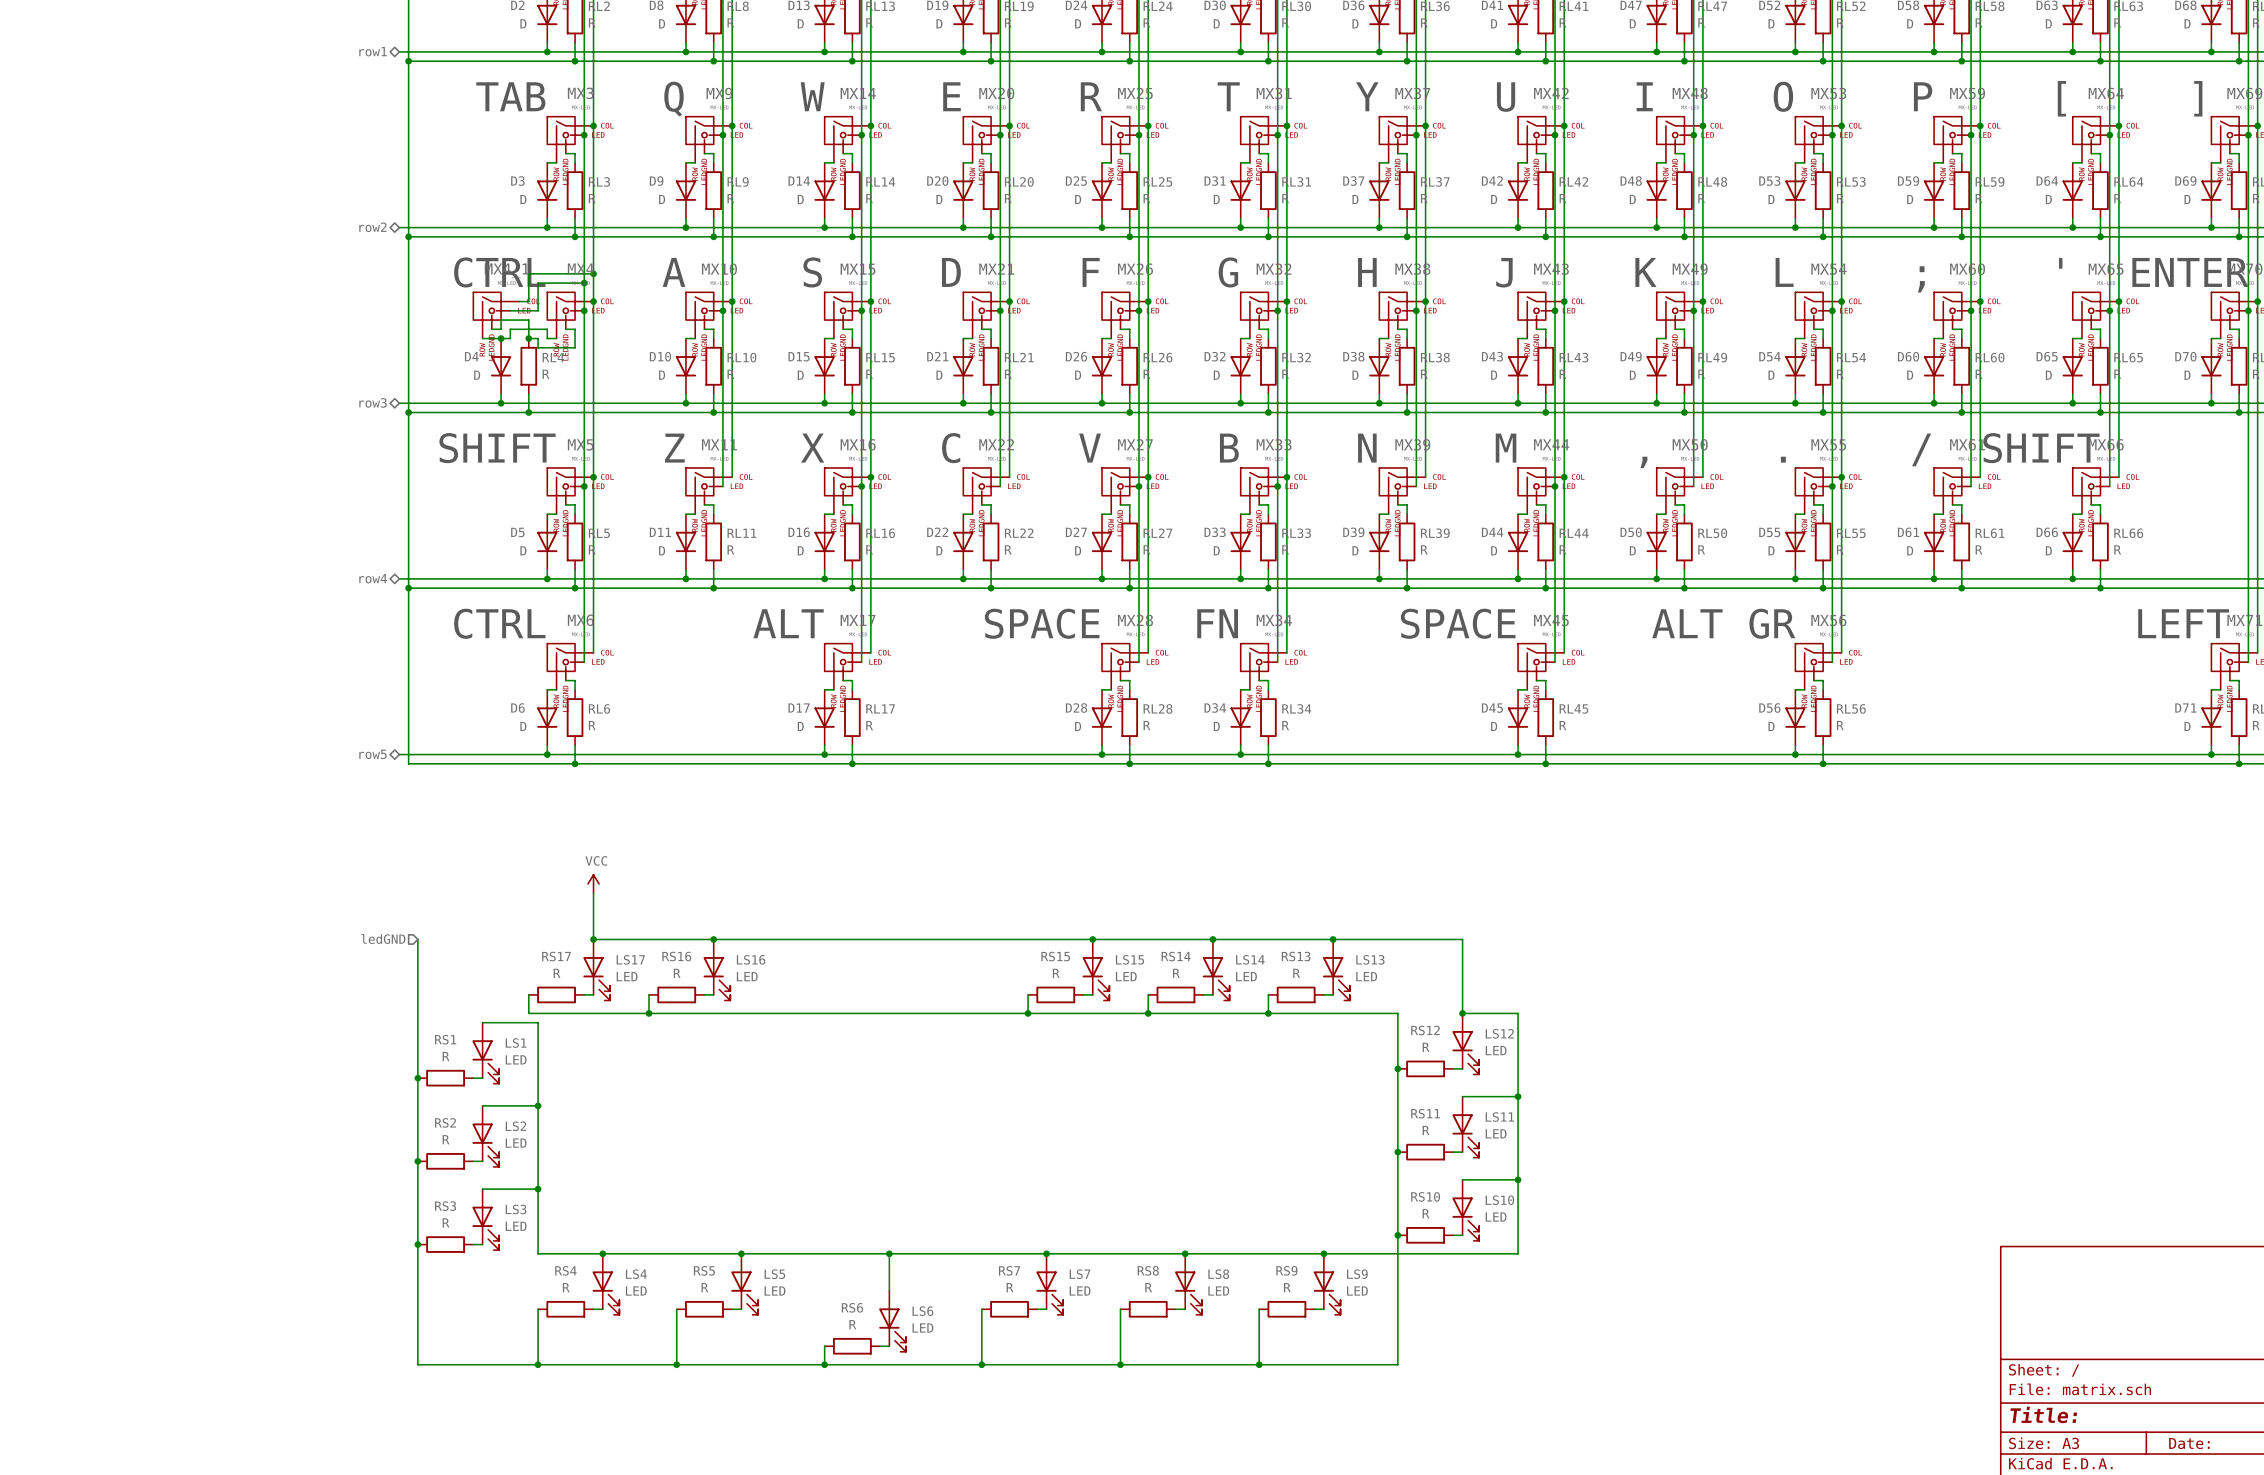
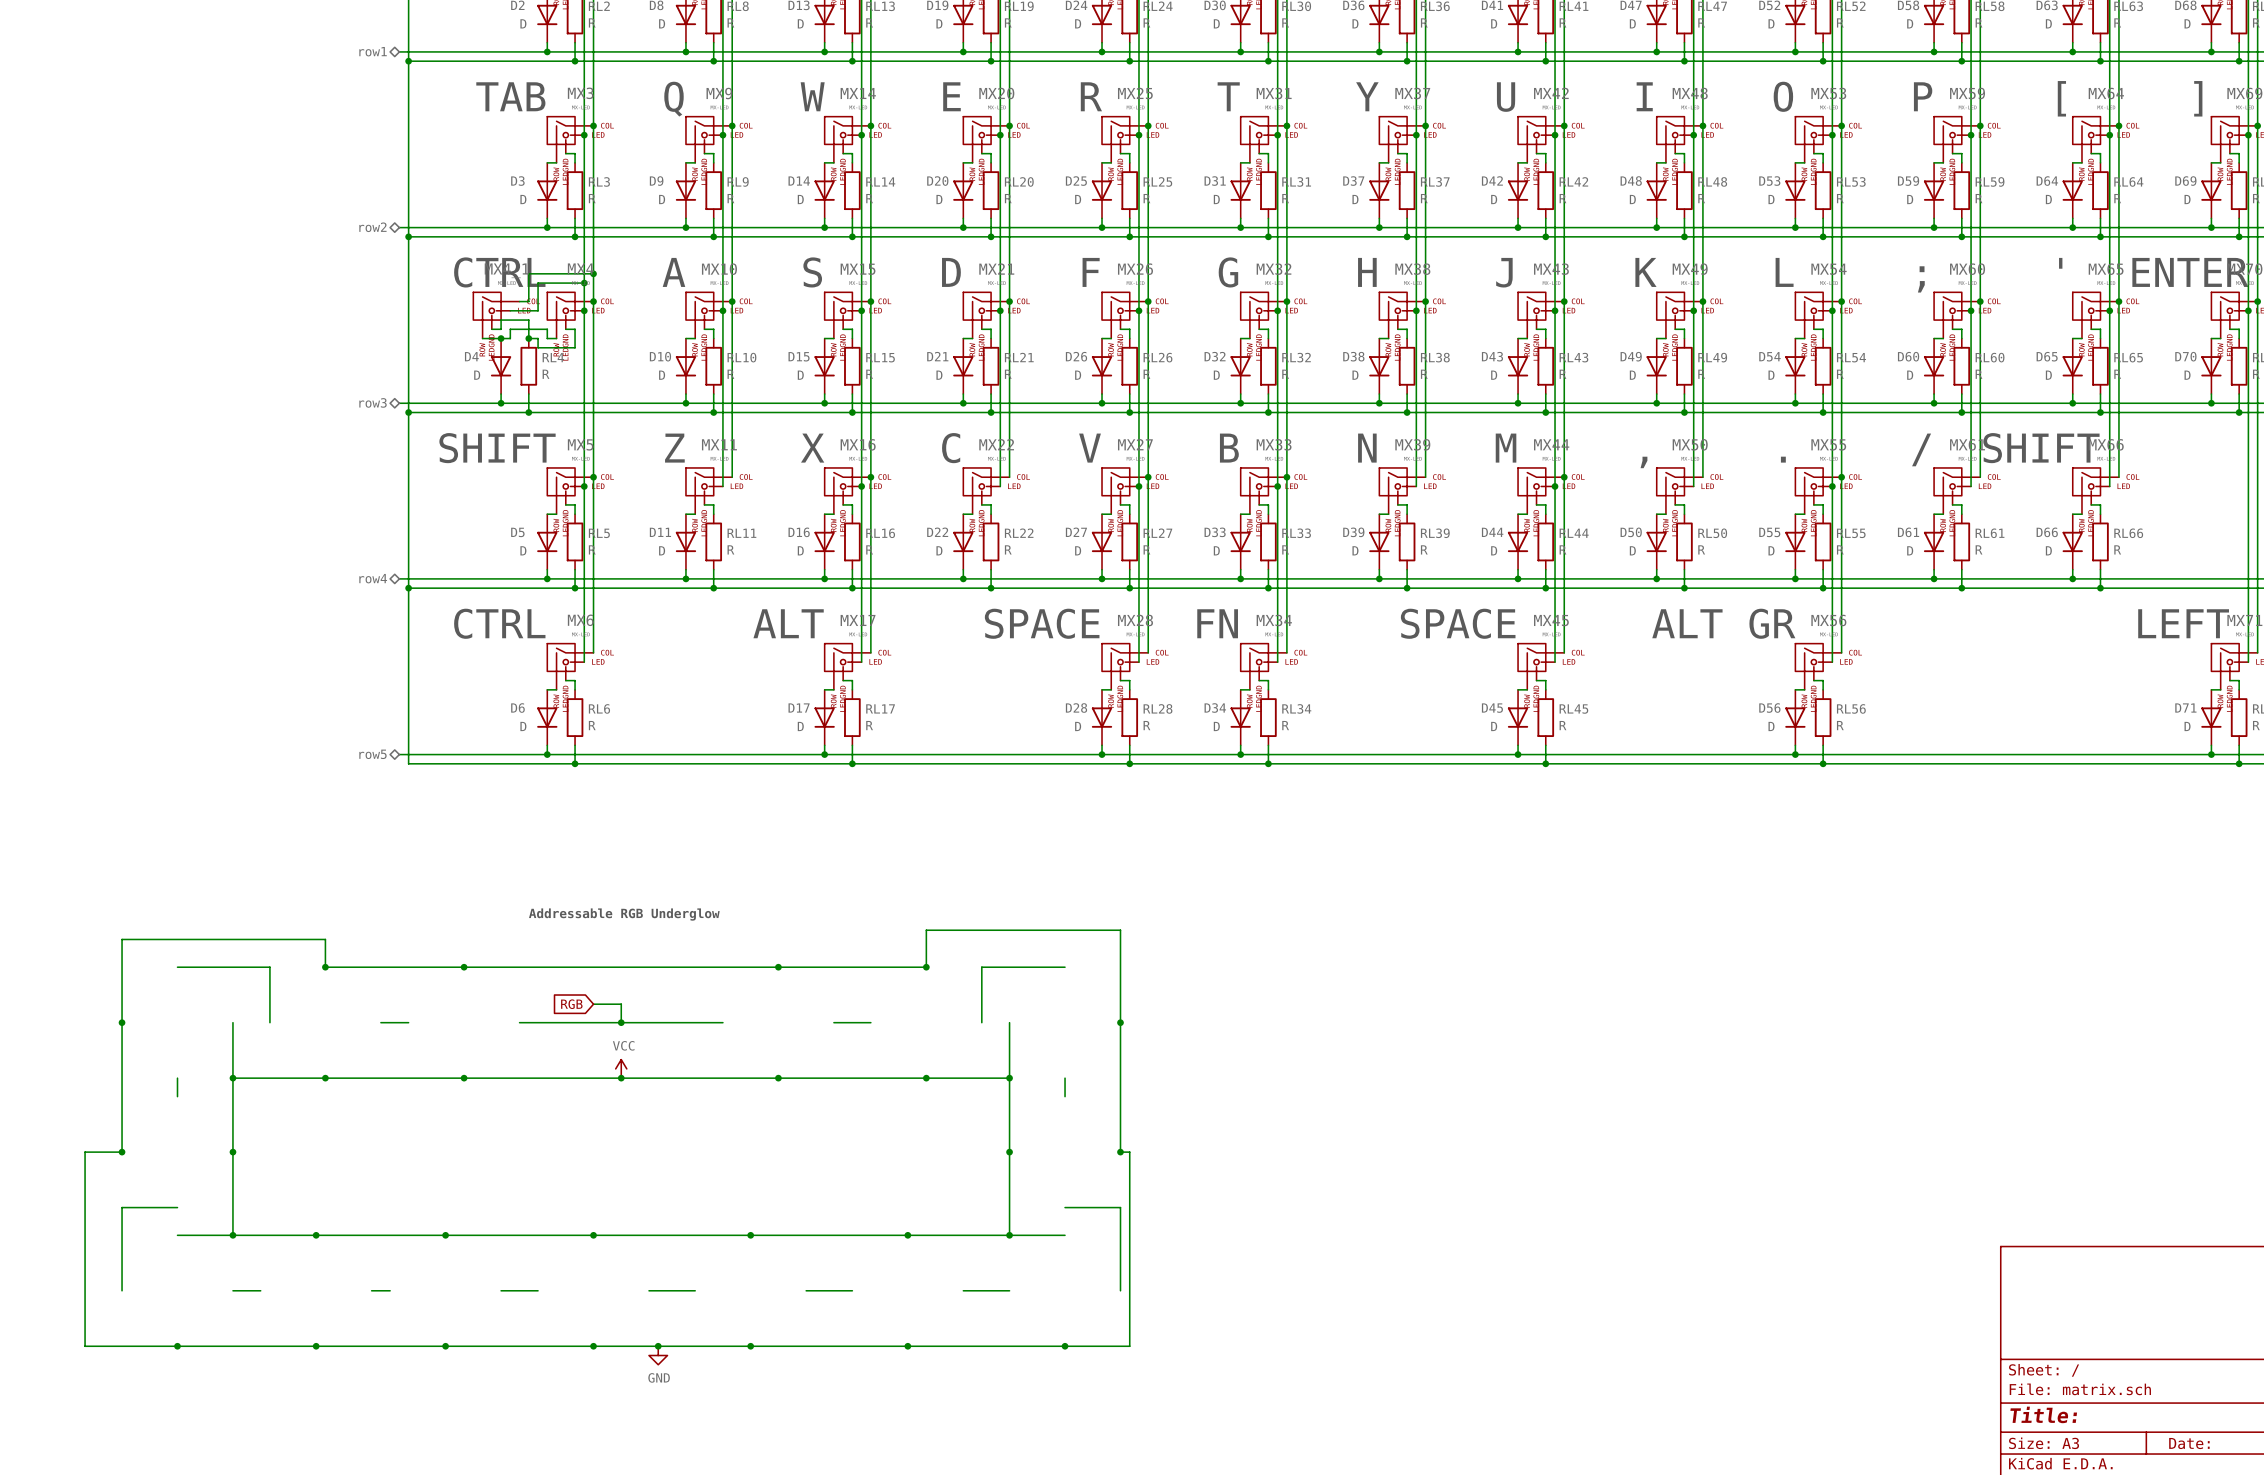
power symbol: VCC (593, 884) -> none
wire: (593, 893) (593, 939) (1462, 939) (1462, 1013) (1518, 1013) (1518, 1253) (538, 1253) (538, 1022) -> (722, 1022) (538, 1022)
text: none -> Addressable RGB Underglow (624, 914)
hierarchical label: ledGND (383, 938) -> none
wire: (417, 939) (417, 1364) (1397, 1364) (1397, 1013) (528, 1013) (528, 994) -> none
junction: (593, 939) -> none
junction: (713, 939) -> none
junction: (1092, 939) -> none
junction: (1212, 939) -> none
junction: (1333, 939) -> none
wire: none -> (177, 967) (269, 967) (269, 1022)
junction: none -> (325, 967)
junction: none -> (464, 967)
junction: none -> (778, 967)
junction: none -> (926, 967)
wire: none -> (1065, 967) (981, 967) (981, 1022)
LS17: LED (596, 969) -> none
LS16: LED (716, 969) -> none
LS15: LED (1095, 969) -> none
LS14: LED (1216, 969) -> none
LS13: LED (1336, 969) -> none
RS17: R (556, 994) -> none
wire: (584, 994) (593, 994) -> none
wire: (648, 994) (648, 1013) -> none
RS16: R (676, 994) -> none
wire: (704, 994) (713, 994) -> none
wire: (1028, 994) (1028, 1013) -> (1065, 1078) (1065, 1096)
RS15: R (1055, 994) -> none
wire: (1083, 994) (1092, 994) -> none
wire: (1148, 994) (1148, 1013) -> none
RS14: R (1175, 994) -> none
wire: (1203, 994) (1212, 994) -> none
wire: (1268, 994) (1268, 1013) -> none
RS13: R (1296, 994) -> none
wire: (1323, 994) (1333, 994) -> none
global label: none -> RGB (571, 1004)
wire: none -> (593, 1004) (621, 1004) (621, 1022)
junction position: (648, 1013) -> (621, 1022)
junction: (1028, 1013) -> none
junction position: (1148, 1013) -> (1120, 1022)
junction: (1268, 1013) -> none
junction: (1462, 1013) -> none
junction: none -> (122, 1022)
wire: none -> (232, 1022) (232, 1235)
wire: none -> (380, 1022) (408, 1022)
wire: (482, 1022) (519, 1022) -> none
wire: none -> (833, 1022) (870, 1022)
wire: none -> (1009, 1022) (1009, 1235)
LS12: LED (1465, 1043) -> none
LS1: LED (485, 1053) -> none
power symbol: none -> VCC (621, 1068)
junction: (1397, 1068) -> none
RS12: R (1425, 1068) -> none
wire: (1453, 1068) (1462, 1068) -> none
wire: none -> (177, 1078) (177, 1096)
wire: none -> (232, 1078) (473, 1078)
junction: none -> (232, 1078)
junction: none -> (325, 1078)
junction: (417, 1078) -> none
RS1: R (445, 1078) -> none
junction: none -> (464, 1078)
wire: none -> (482, 1078) (1009, 1078)
junction: none -> (621, 1078)
junction: none -> (778, 1078)
junction: none -> (926, 1078)
junction: none -> (1009, 1078)
wire: (1462, 1096) (1518, 1096) -> none
junction: (1518, 1096) -> none
wire: (482, 1105) (538, 1105) -> none
junction: (538, 1105) -> none
LS11: LED (1465, 1127) -> none
LS2: LED (485, 1136) -> none
junction: none -> (122, 1152)
junction: none -> (232, 1152)
junction: none -> (1009, 1152)
junction: none -> (1120, 1152)
junction: (1397, 1152) -> none
RS11: R (1425, 1152) -> none
wire: (1453, 1152) (1462, 1152) -> none
junction: (417, 1161) -> none
RS2: R (445, 1161) -> none
wire: (473, 1161) (482, 1161) -> none
wire: (1462, 1179) (1518, 1179) -> none
junction: (1518, 1179) -> none
wire: (482, 1189) (538, 1189) -> none
junction: (538, 1189) -> none
wire: none -> (177, 1207) (122, 1207) (122, 1290)
wire: none -> (1065, 1207) (1120, 1207) (1120, 1290)
LS10: LED (1465, 1210) -> none
LS3: LED (485, 1219) -> none
wire: none -> (177, 1235) (1065, 1235)
junction: none -> (232, 1235)
junction: none -> (316, 1235)
junction: (1397, 1235) -> none
RS10: R (1425, 1235) -> none
wire: (1453, 1235) (1462, 1235) -> none
junction position: (417, 1244) -> (445, 1235)
RS3: R (445, 1244) -> none
wire: (473, 1244) (482, 1244) -> none
junction position: (602, 1253) -> (593, 1235)
junction position: (741, 1253) -> (750, 1235)
wire: (889, 1253) (889, 1290) -> none
junction position: (889, 1253) -> (907, 1235)
junction position: (1046, 1253) -> (1009, 1235)
junction: (1185, 1253) -> none
junction: (1323, 1253) -> none
LS4: LED (606, 1284) -> none
LS5: LED (744, 1284) -> none
LS7: LED (1049, 1284) -> none
LS8: LED (1188, 1284) -> none
LS9: LED (1327, 1284) -> none
wire: none -> (232, 1290) (260, 1290)
wire: none -> (371, 1290) (390, 1290)
wire: none -> (501, 1290) (538, 1290)
wire: none -> (648, 1290) (695, 1290)
wire: none -> (806, 1290) (852, 1290)
wire: none -> (963, 1290) (1009, 1290)
wire: (538, 1309) (538, 1364) -> none
RS4: R (565, 1309) -> none
wire: (593, 1309) (602, 1309) -> none
wire: (676, 1309) (676, 1364) -> none
RS5: R (704, 1309) -> none
wire: (732, 1309) (741, 1309) -> none
wire: (981, 1309) (981, 1364) -> none
RS7: R (1009, 1309) -> none
wire: (1037, 1309) (1046, 1309) -> none
wire: (1120, 1309) (1120, 1364) -> none
RS8: R (1148, 1309) -> none
wire: (1175, 1309) (1185, 1309) -> none
wire: (1259, 1309) (1259, 1364) -> none
RS9: R (1286, 1309) -> none
wire: (1314, 1309) (1323, 1309) -> none
LS6: LED (892, 1321) -> none
junction: none -> (177, 1346)
junction: none -> (316, 1346)
junction: none -> (445, 1346)
junction: none -> (593, 1346)
junction: none -> (750, 1346)
wire: (824, 1346) (824, 1364) -> none
RS6: R (852, 1346) -> none
wire: none -> (880, 1346) (85, 1346) (85, 1152) (122, 1152) (122, 939) (325, 939) (325, 967) (926, 967) (926, 930) (1120, 930) (1120, 1152) (1129, 1152) (1129, 1346) (889, 1346)
junction: none -> (907, 1346)
junction: none -> (1065, 1346)
power symbol: none -> GND (658, 1355)
junction: (538, 1364) -> none
junction position: (676, 1364) -> (658, 1346)
junction: (824, 1364) -> none
junction: (981, 1364) -> none
junction: (1120, 1364) -> none
junction: (1259, 1364) -> none

